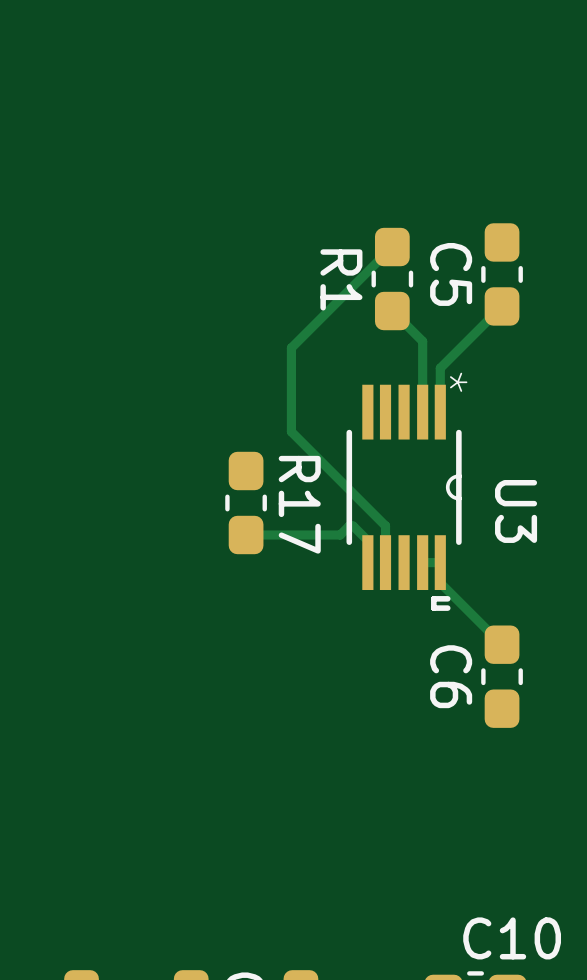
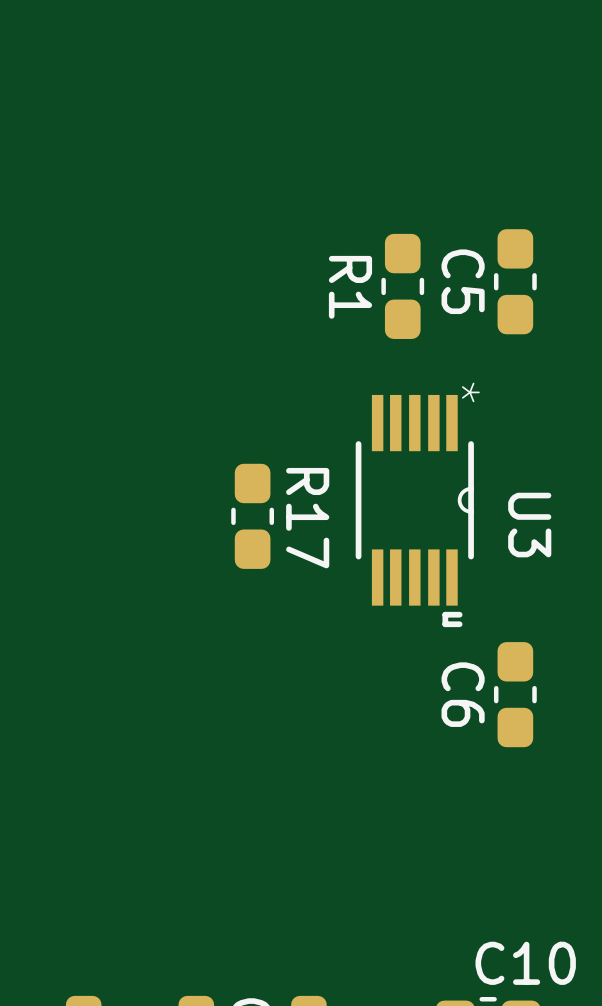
track: (392, 247) (291, 347) (291, 431) (385, 525) (385, 562) -> none
track: (502, 306) (440, 368) (440, 412) -> none
track: (392, 311) (422, 341) (422, 412) -> none
track: (246, 534) (340, 534) (349, 526) (353, 526) (367, 540) (367, 562) -> none
track: (422, 562) (440, 562) (440, 582) (502, 644) -> none

